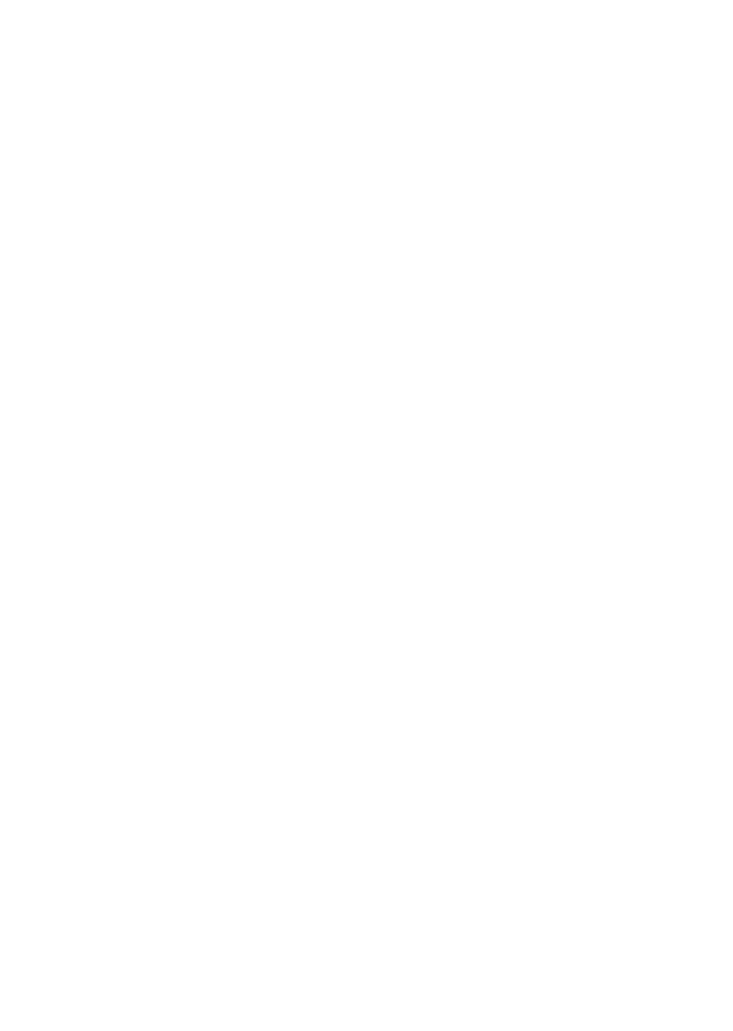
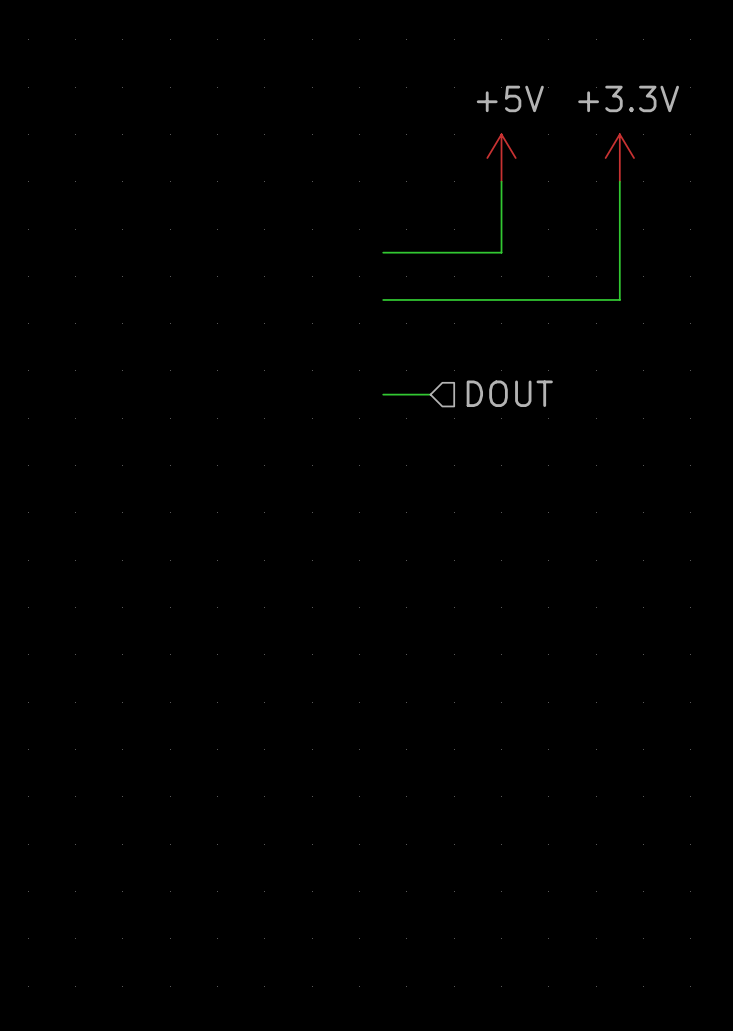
power symbol: none -> +5V (501, 158)
power symbol: none -> +3.3V (619, 158)
wire: none -> (501, 181) (501, 252) (383, 252)
wire: none -> (619, 181) (619, 299) (383, 299)
hierarchical label: none -> DOUT (509, 393)
wire: none -> (383, 394) (430, 394)

